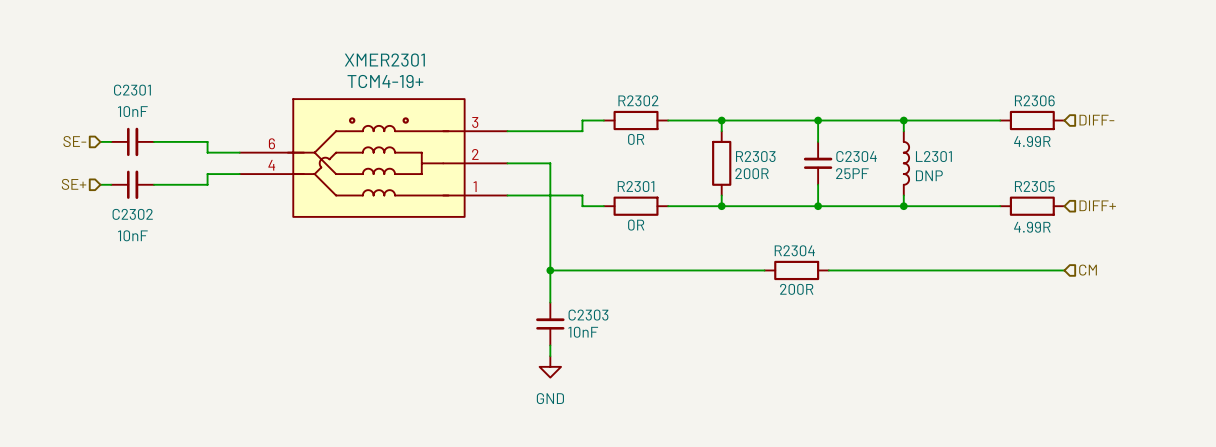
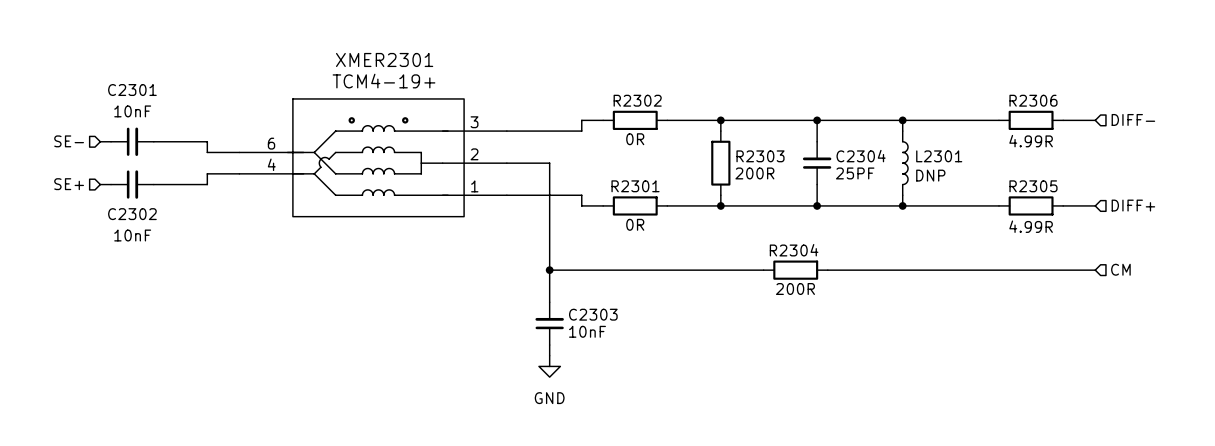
wire: none -> (1063, 120) (1095, 120)
hierarchical label position: DIFF- (1096, 120) -> DIFF- (1133, 119)
hierarchical label position: DIFF+ (1097, 205) -> DIFF+ (1133, 205)
wire: none -> (1063, 205) (1095, 205)
wire: none -> (1063, 270) (1095, 270)
hierarchical label position: CM (1088, 270) -> CM (1120, 269)

